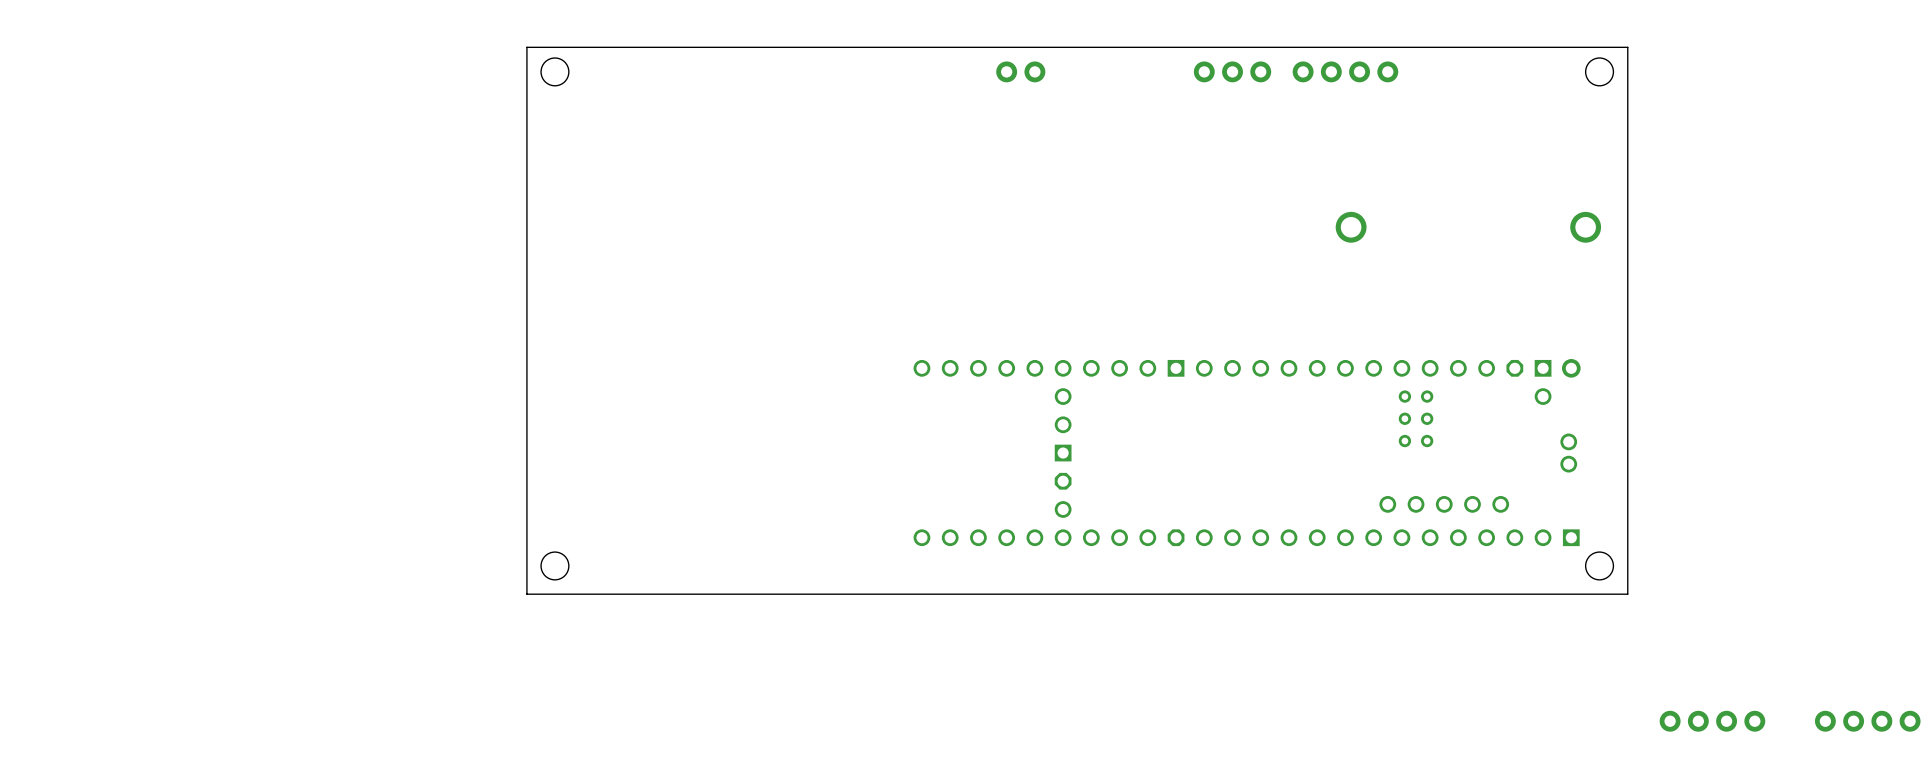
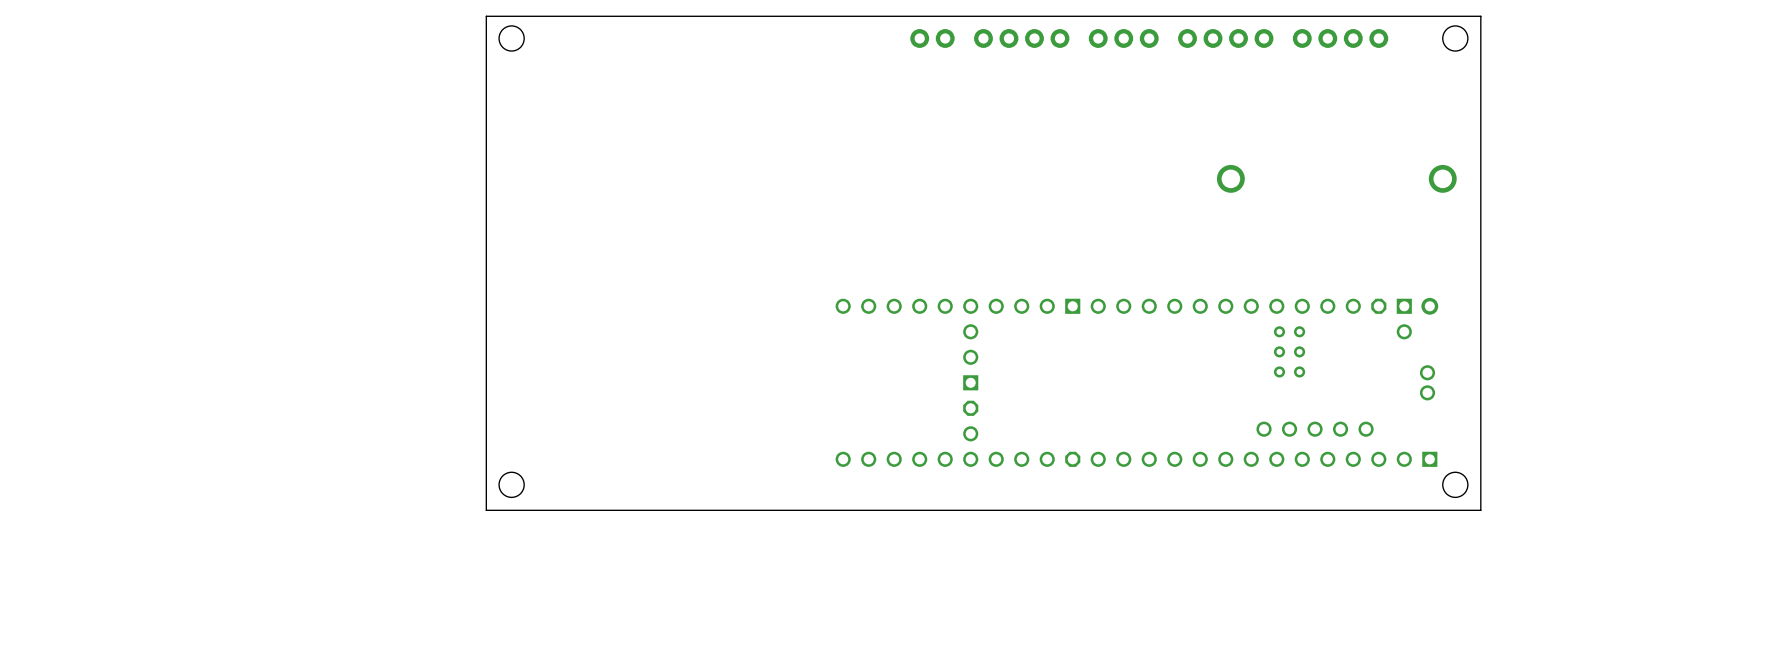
part: none -> (1021, 38)
part: none -> (1340, 38)
part: (1712, 721) -> none
part: (1867, 721) -> none

